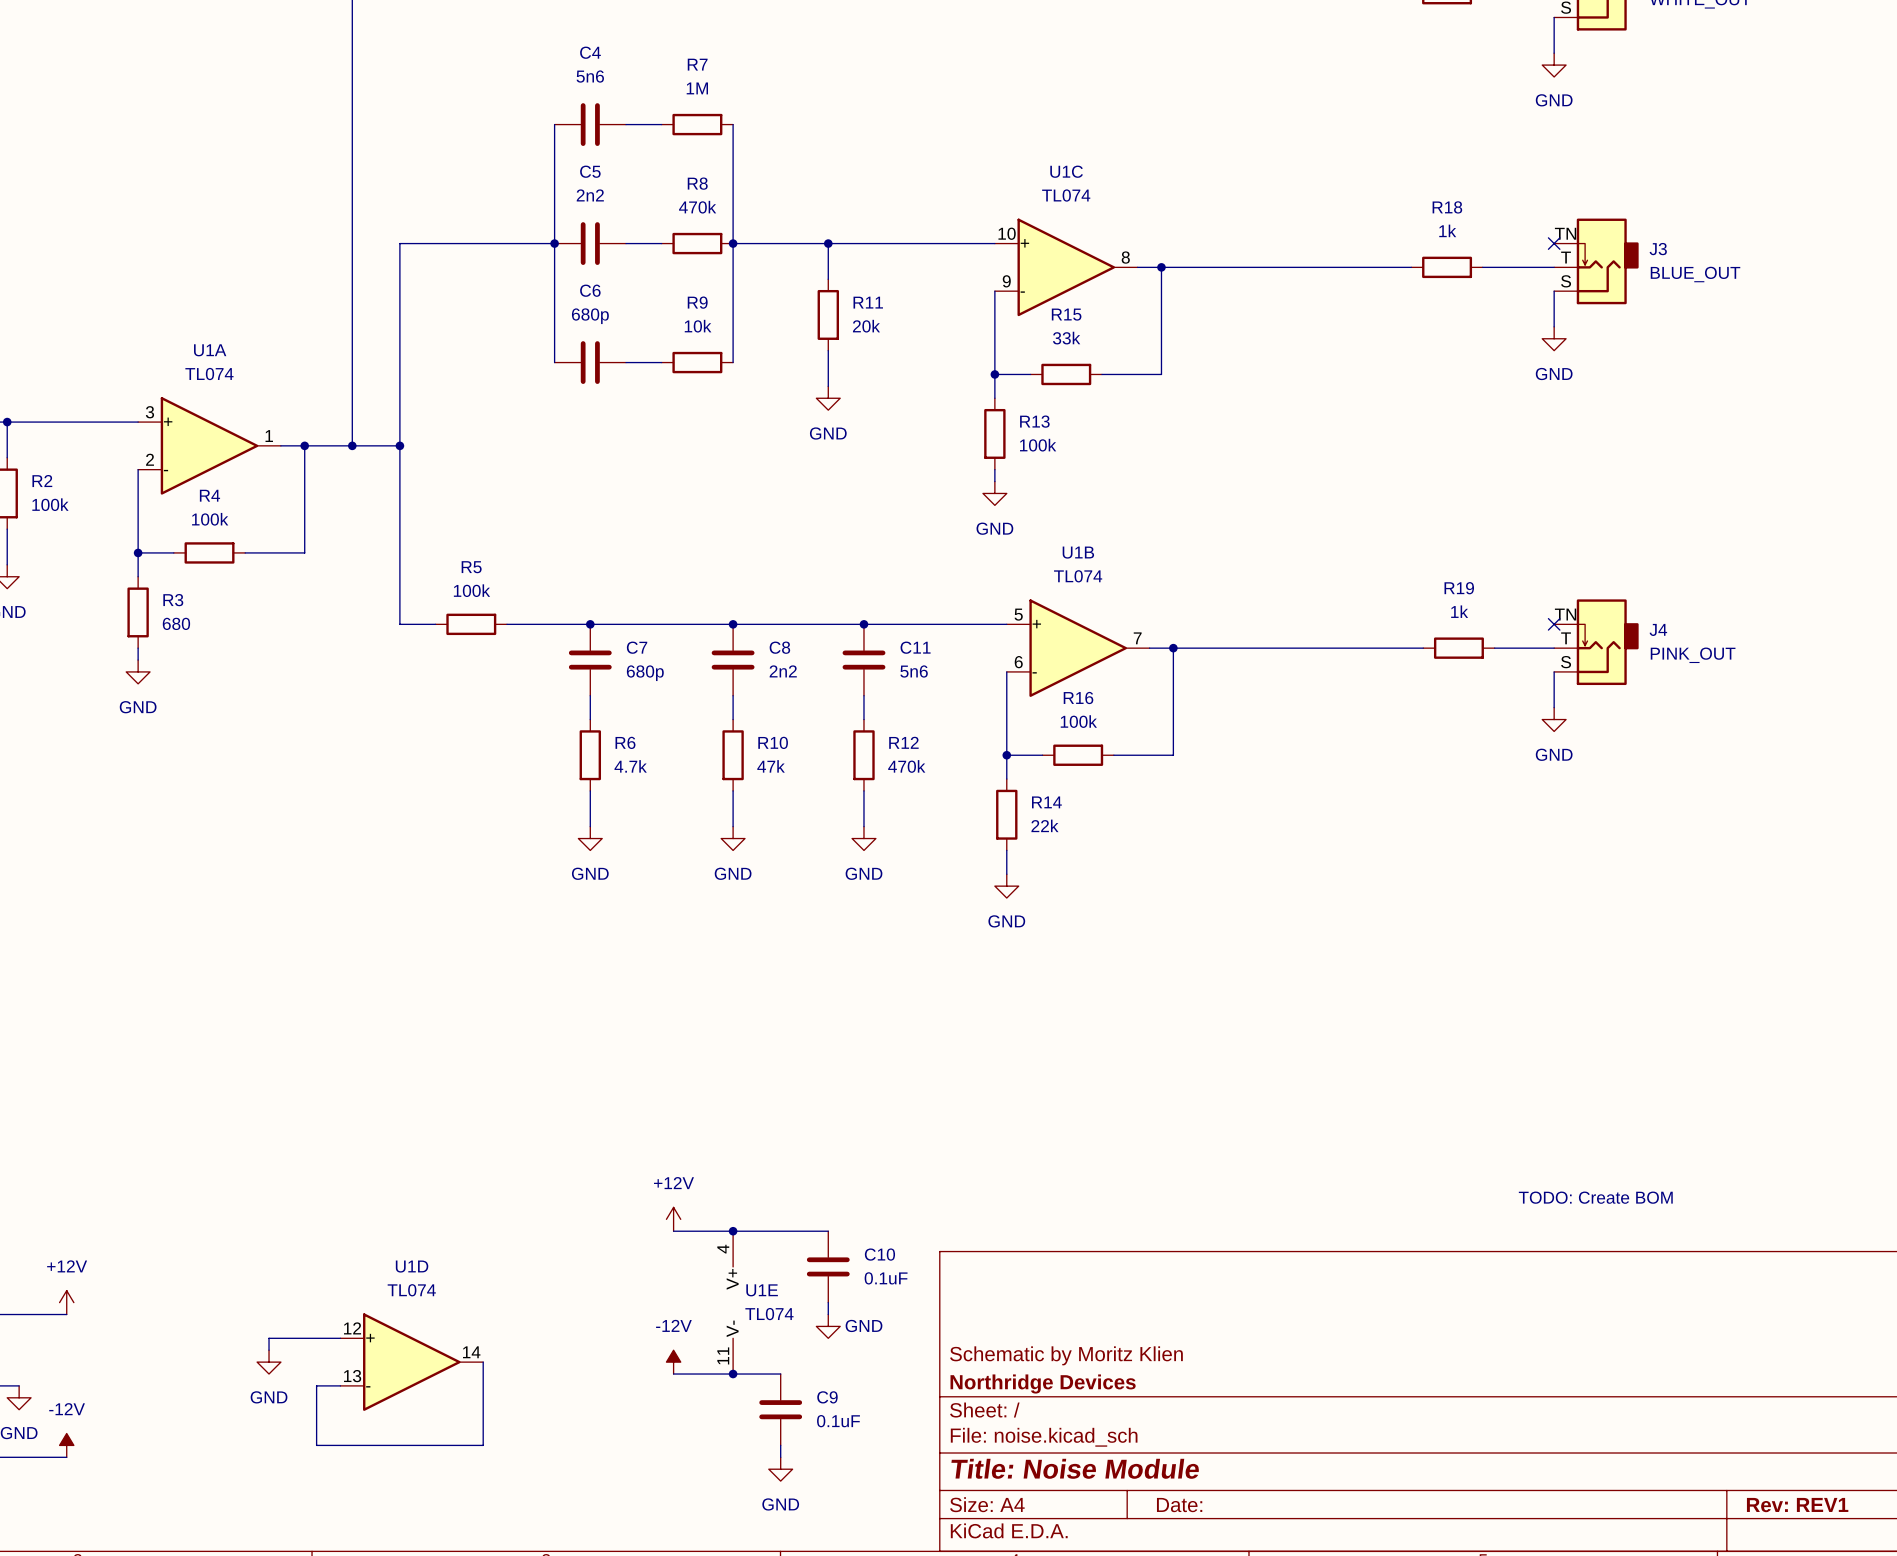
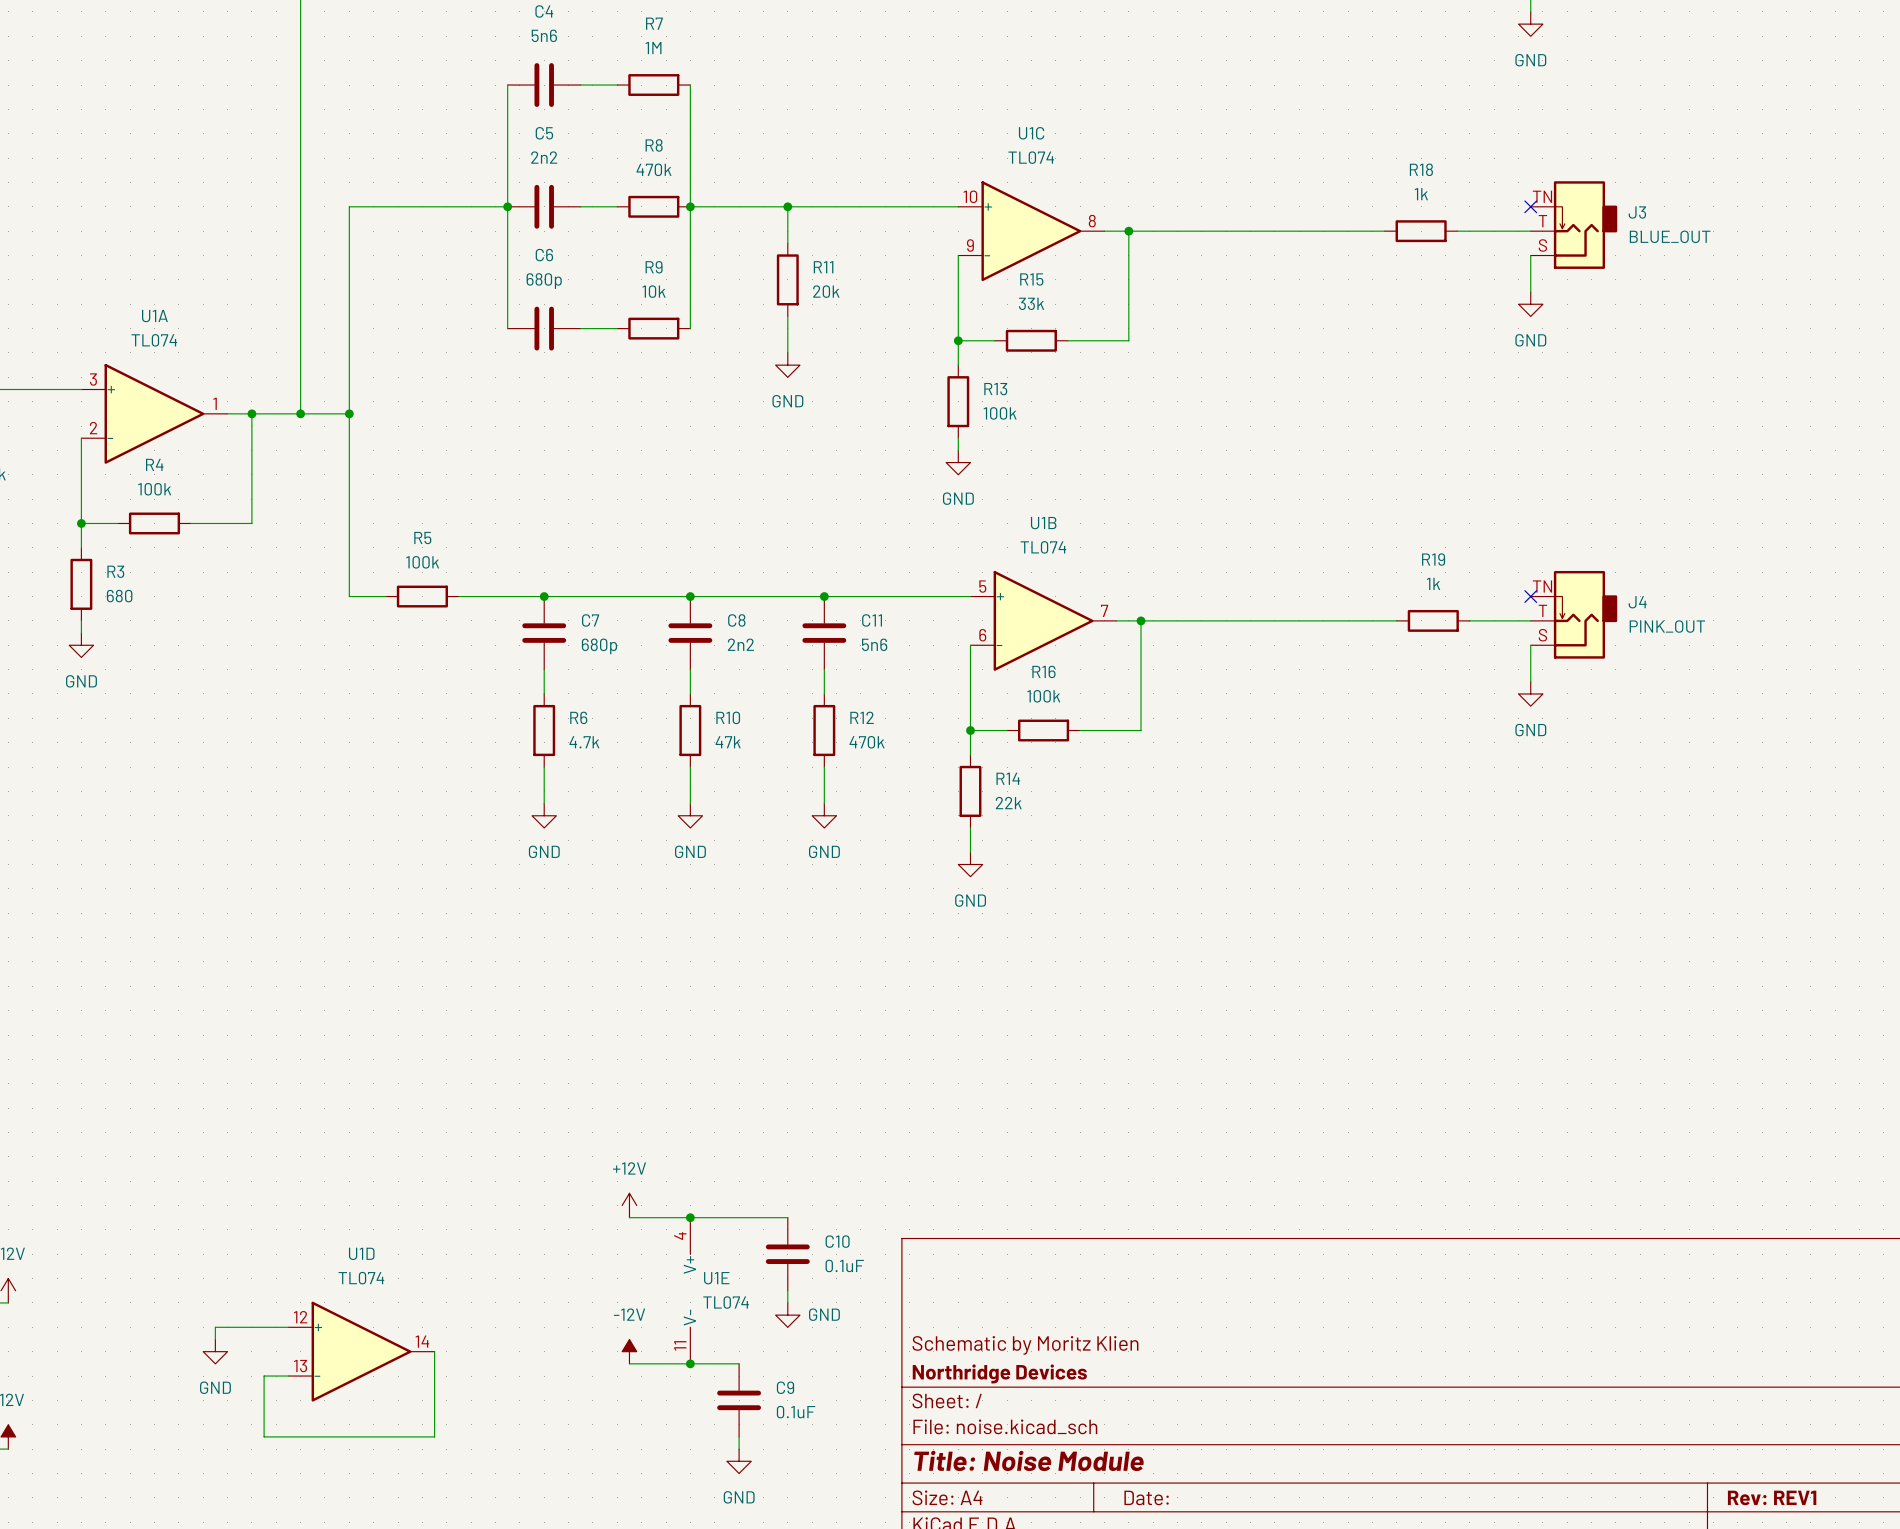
text: TODO: Create BOM (1595, 1197) -> none

